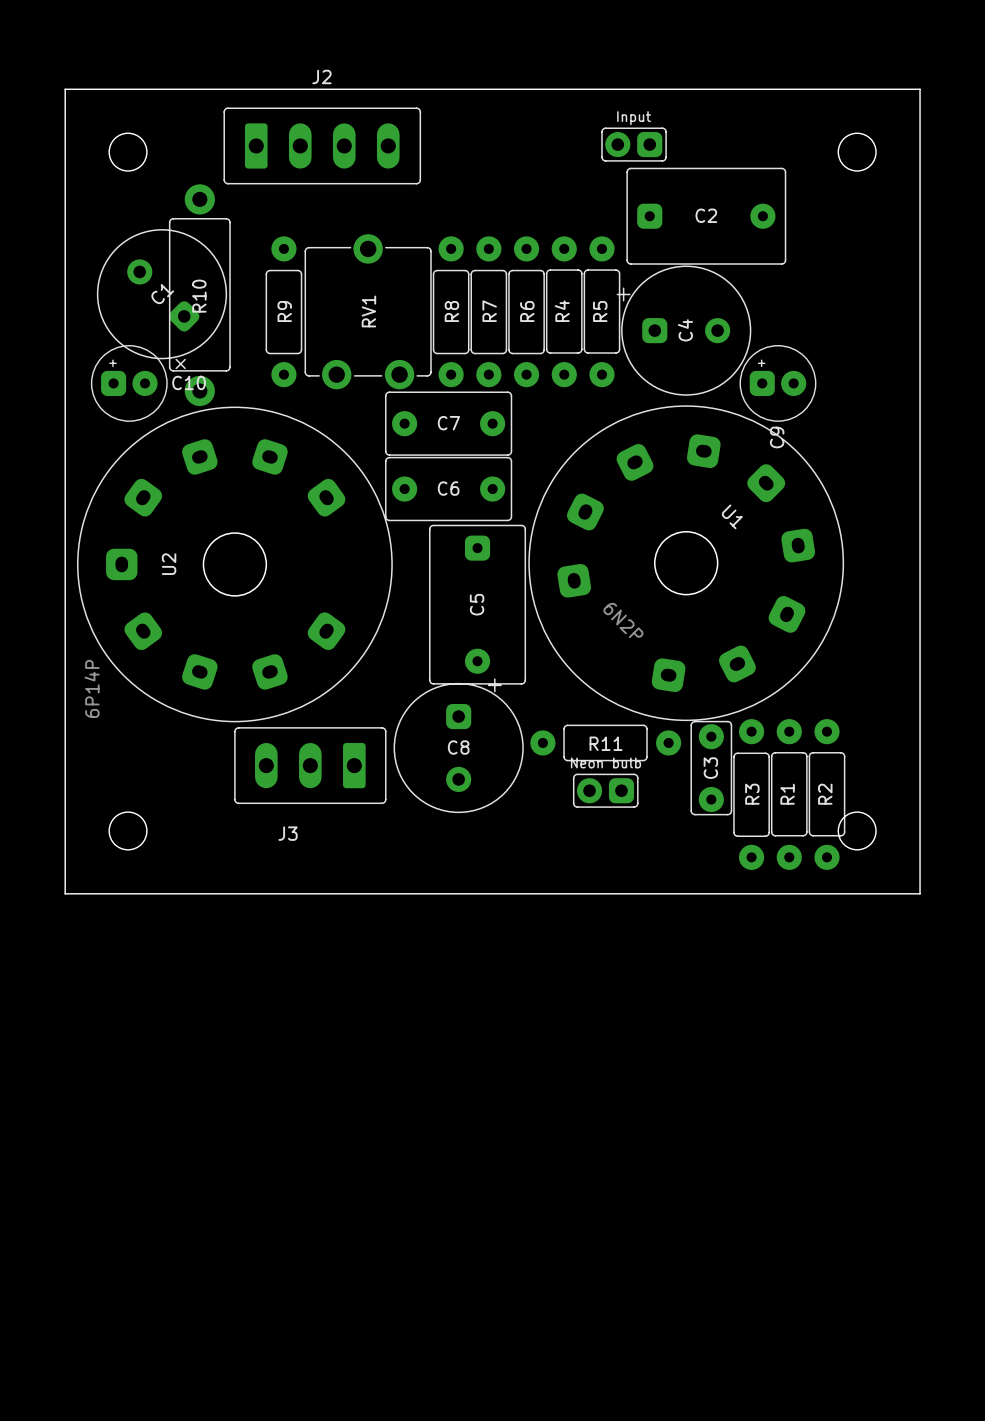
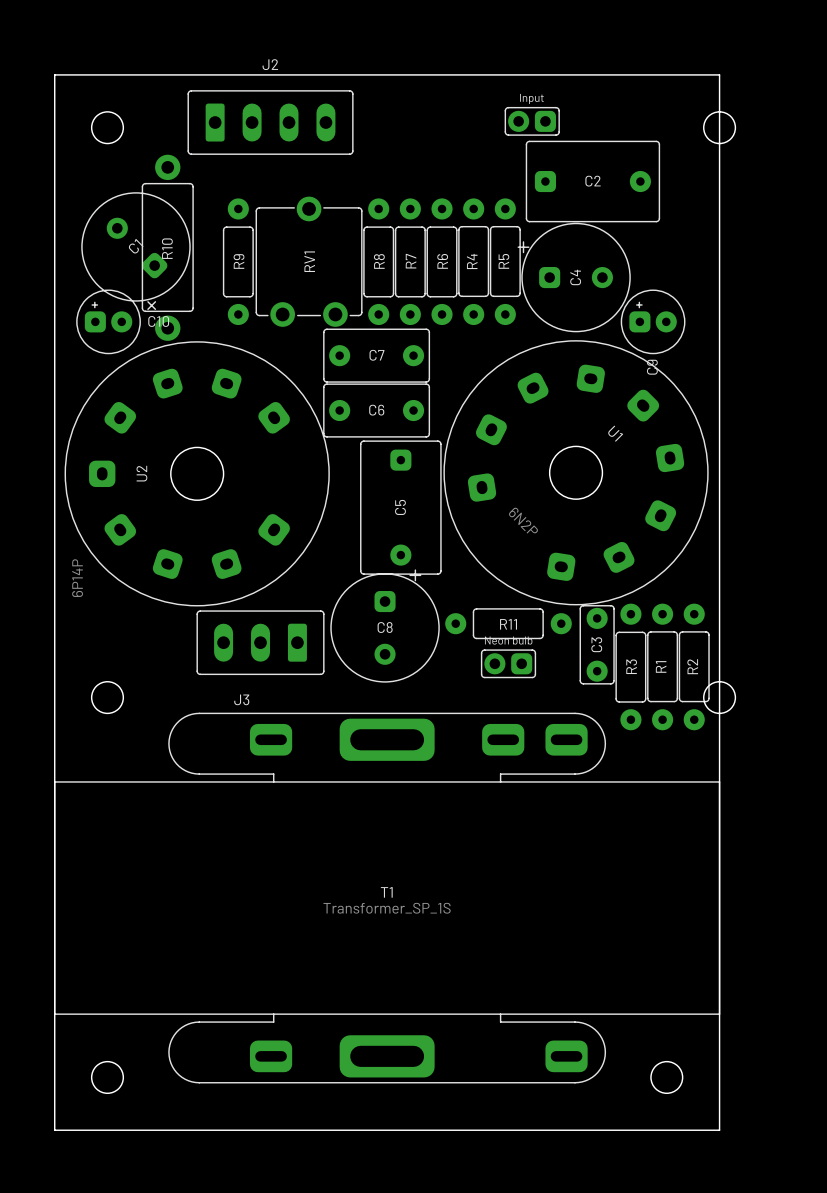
board edge: (857, 89) (920, 89) (920, 893) (65, 893) -> (719, 74) (719, 1130) (54, 1130) (54, 750)
T1: none -> Transformer_SP_1S (387, 898)
round board edge: none -> [91, 1061, 124, 1094]
round board edge: none -> [650, 1061, 684, 1094]

